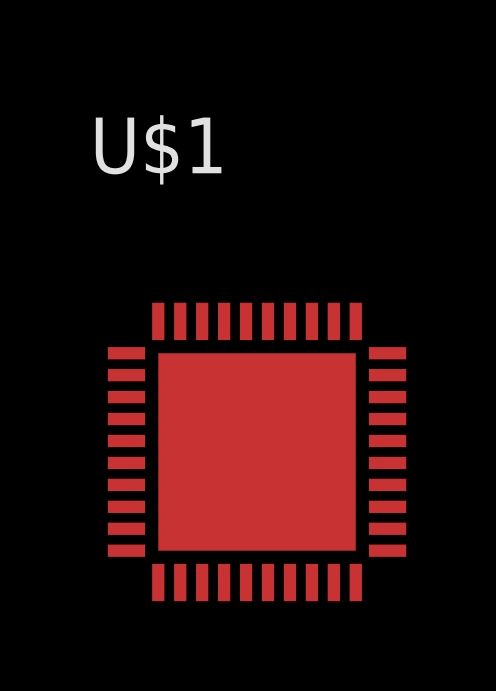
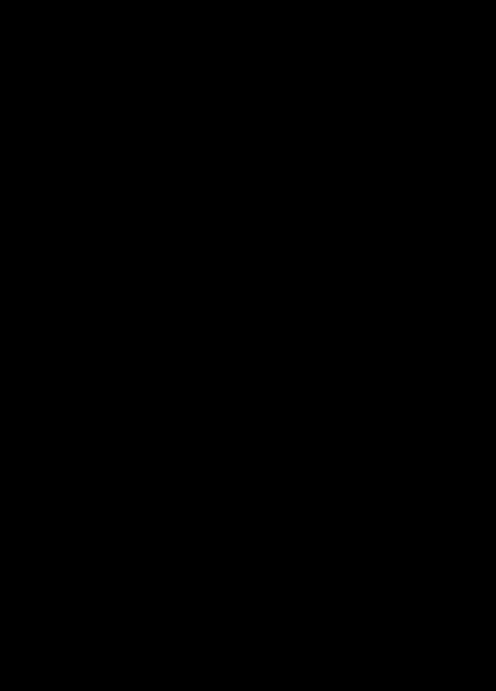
U$1: (257, 451) -> none

